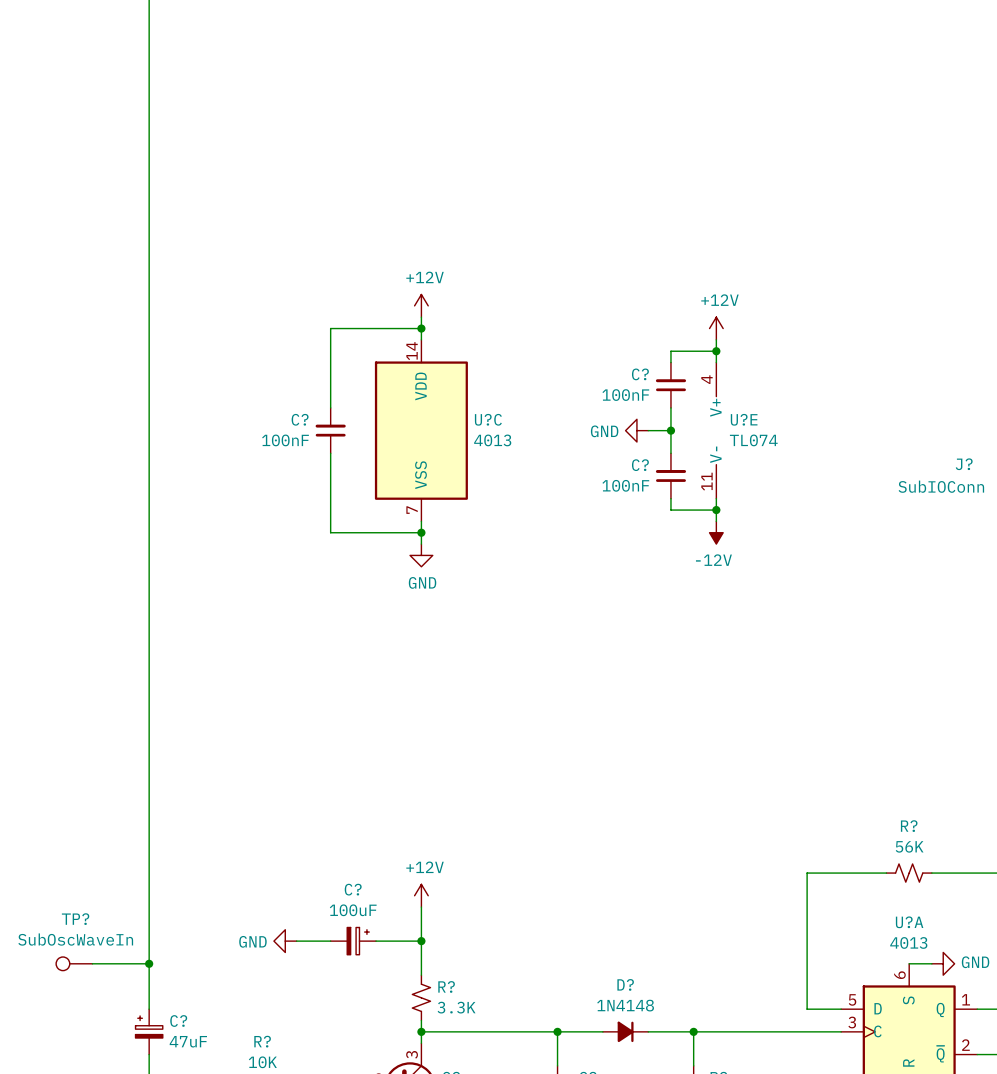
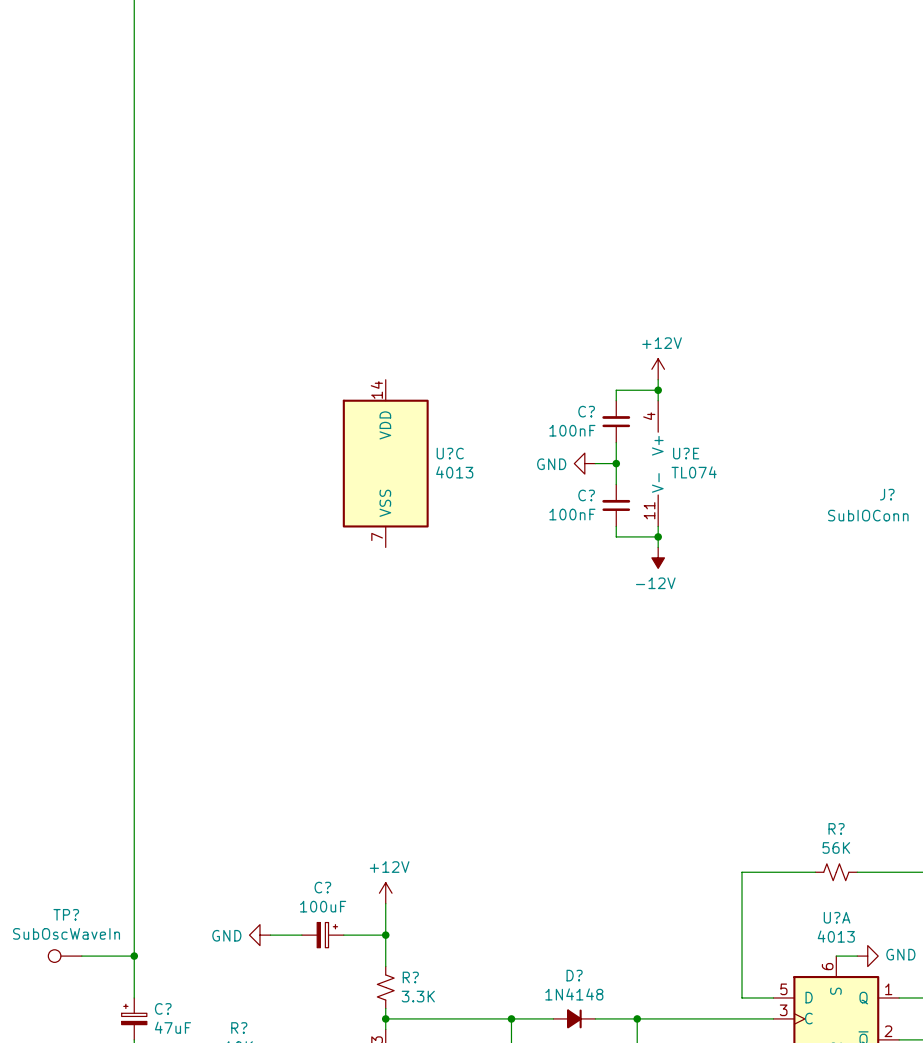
power symbol: +12V (421, 305) -> none
wire: (421, 317) (421, 339) -> none
wire: (421, 328) (330, 328) (330, 407) -> none
junction: (421, 328) -> none
C?: 100nF (330, 430) -> none
wire: (330, 453) (330, 532) (421, 532) -> none
wire: (421, 521) (421, 544) -> none
junction: (421, 532) -> none
power symbol: GND (421, 555) -> none

